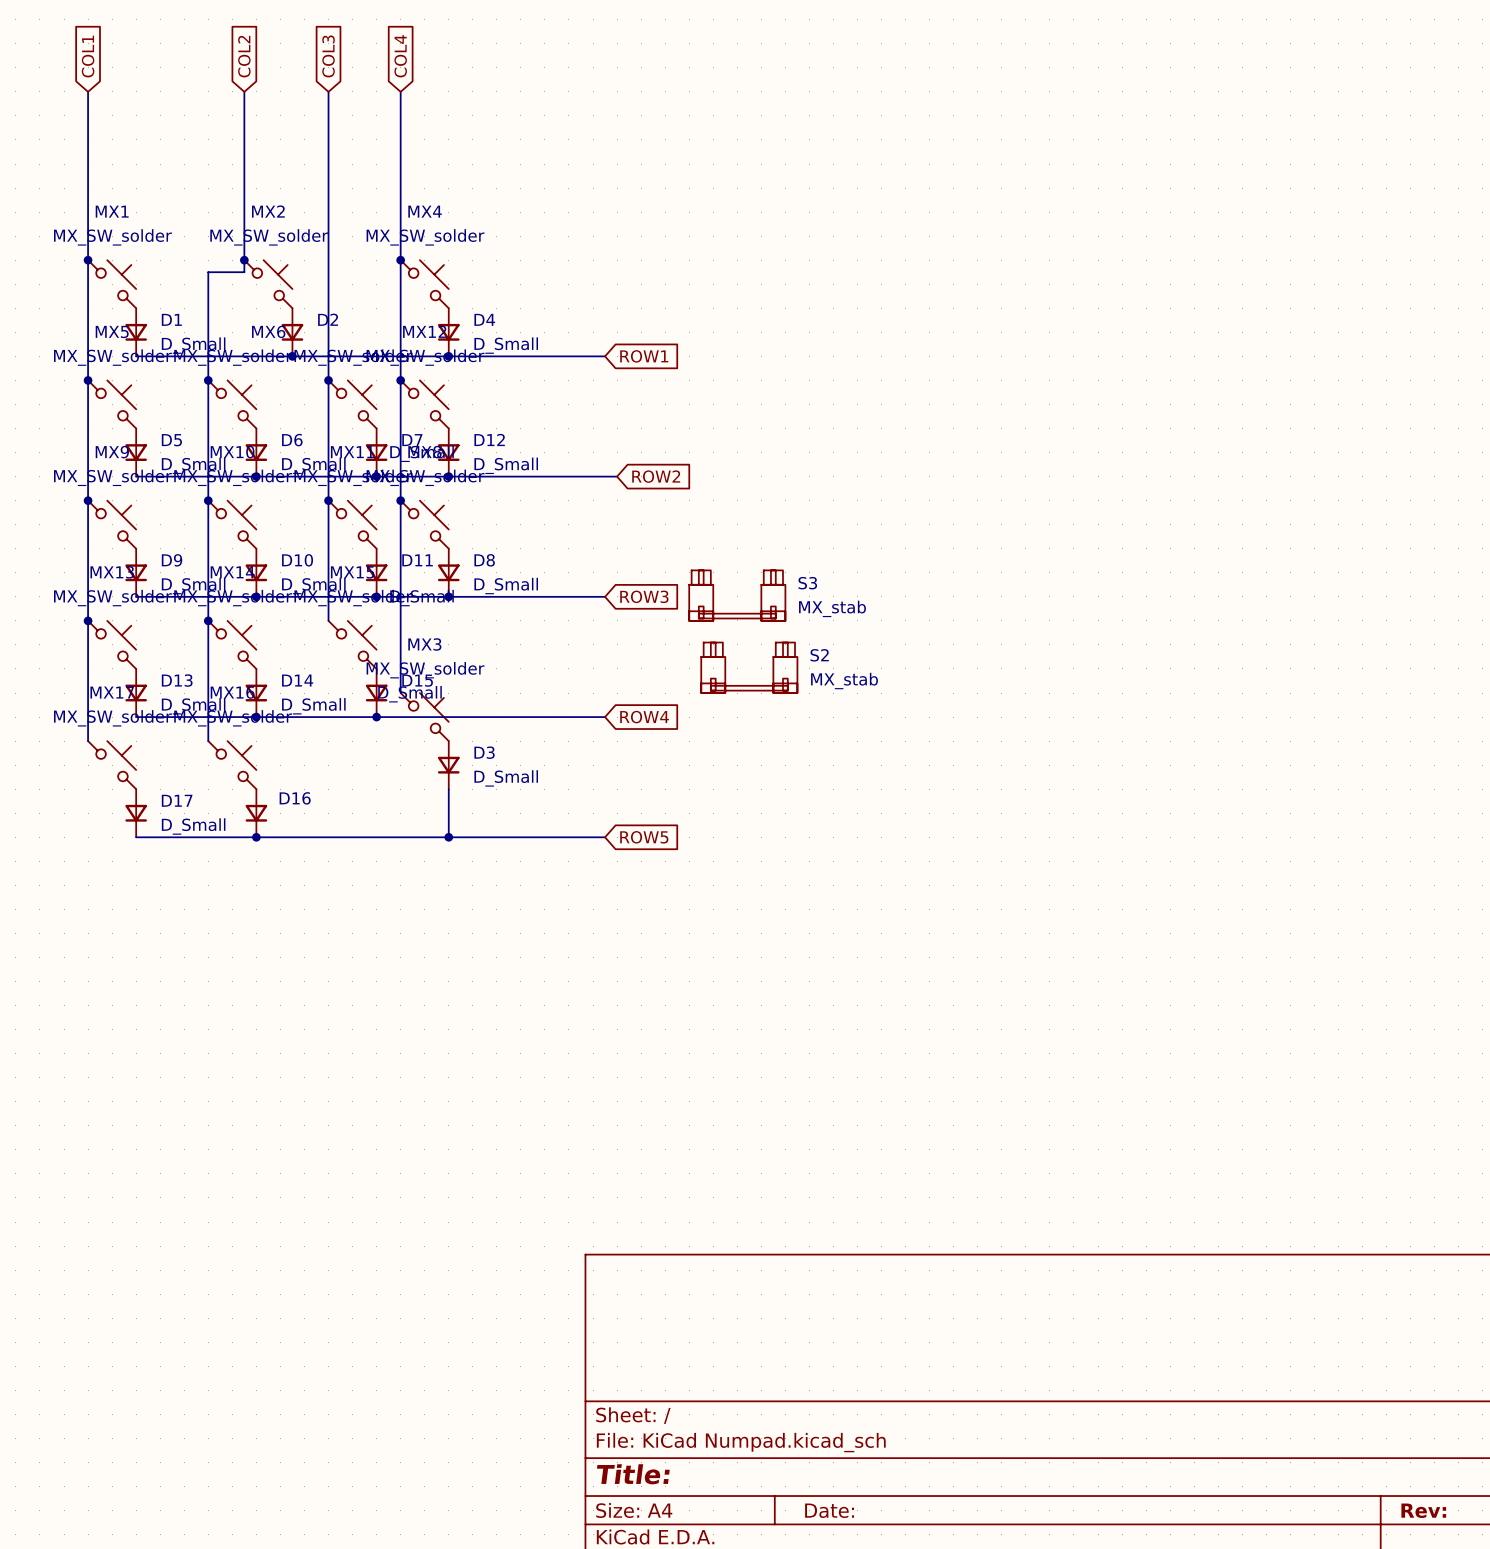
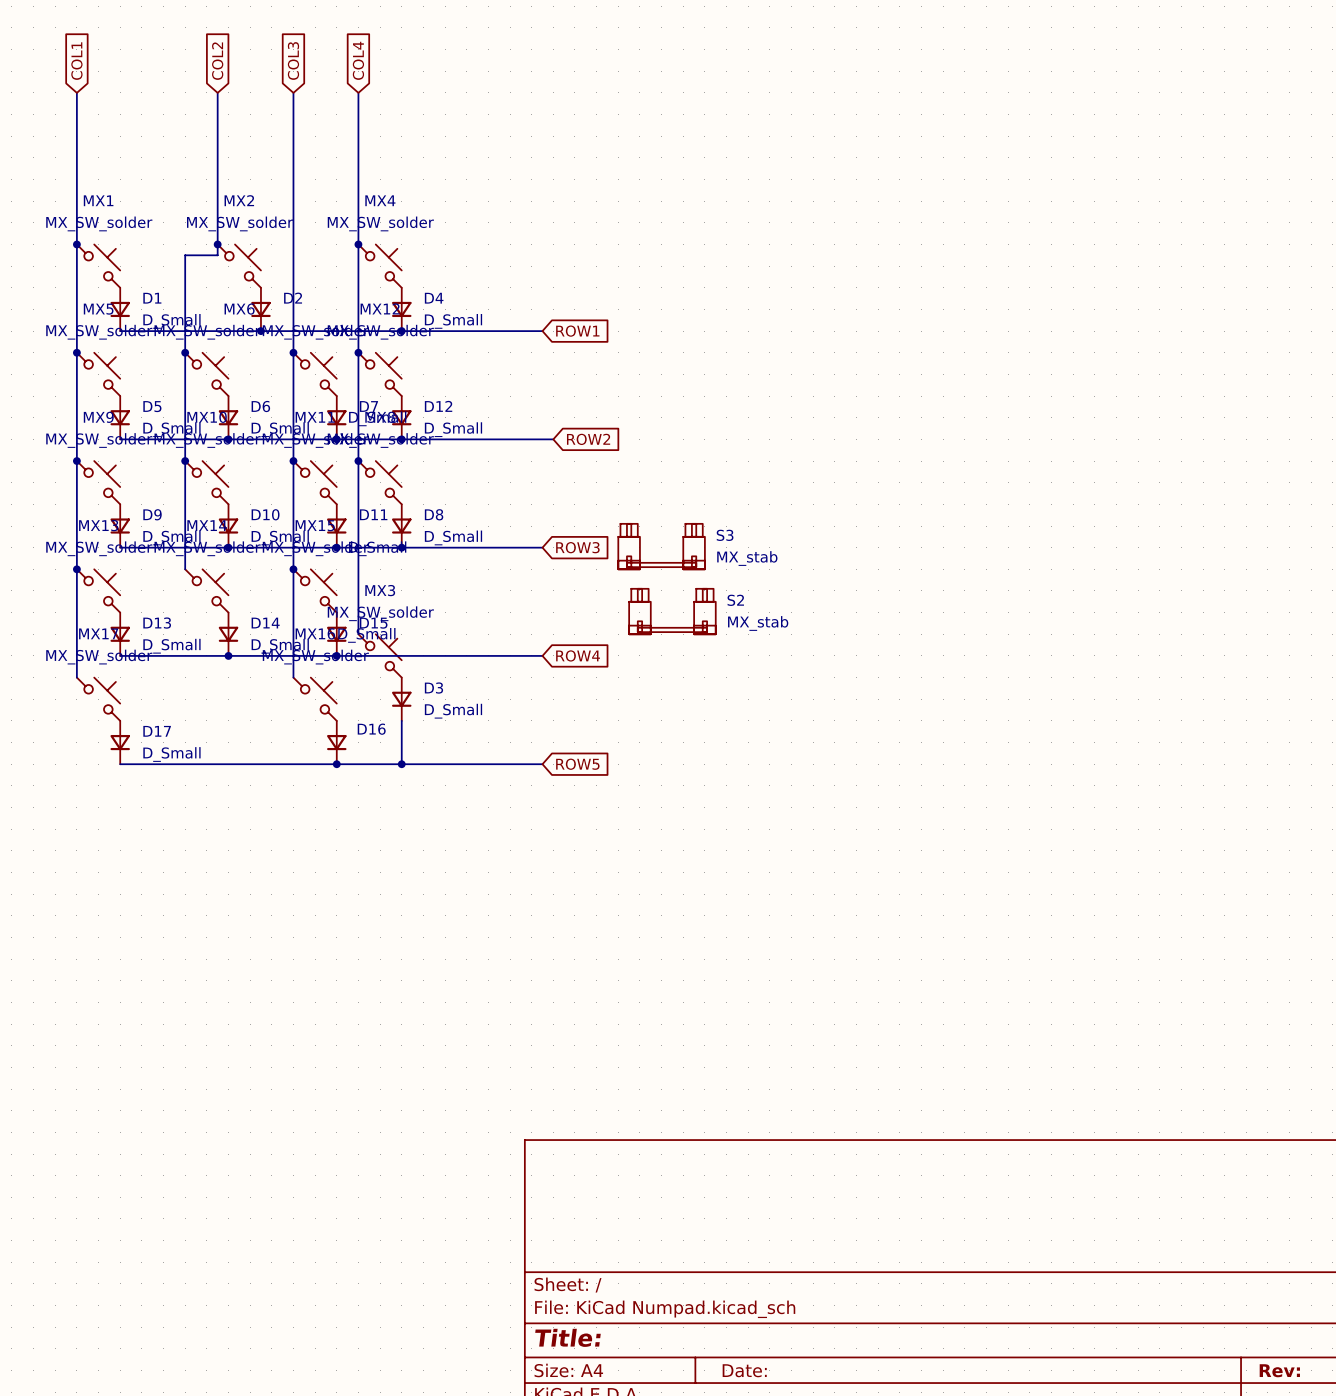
wire: (208, 620) (208, 741) -> (293, 569) (293, 677)
junction: (208, 620) -> none
junction: none -> (293, 569)
MX16 position: (232, 765) -> (315, 699)
D16 position: (256, 813) -> (336, 742)
junction: (256, 837) -> none
junction: none -> (336, 764)

